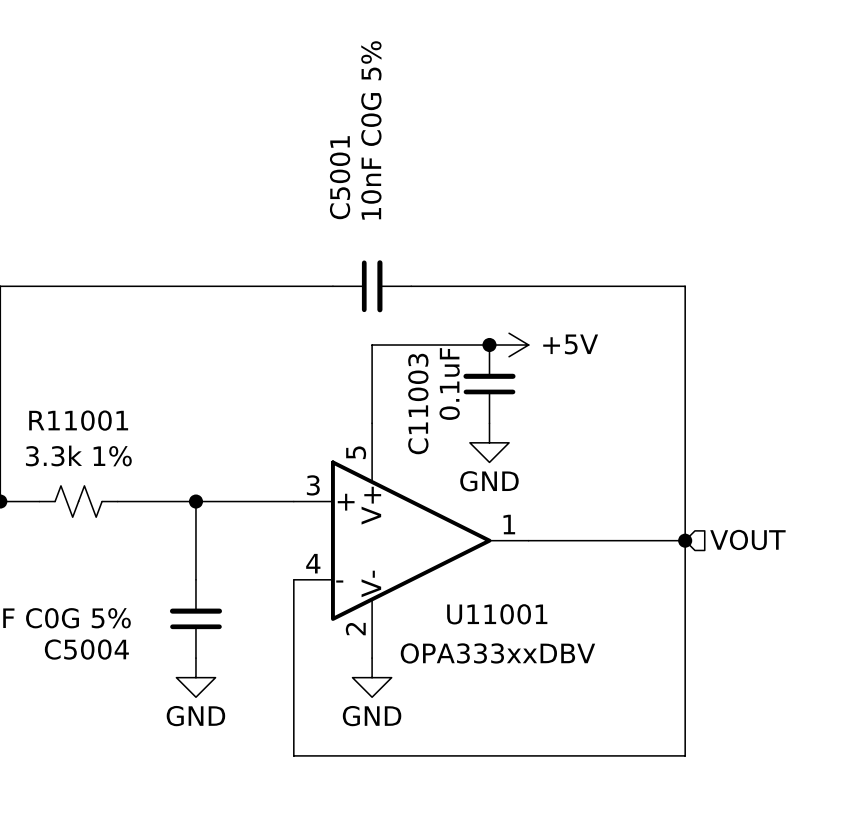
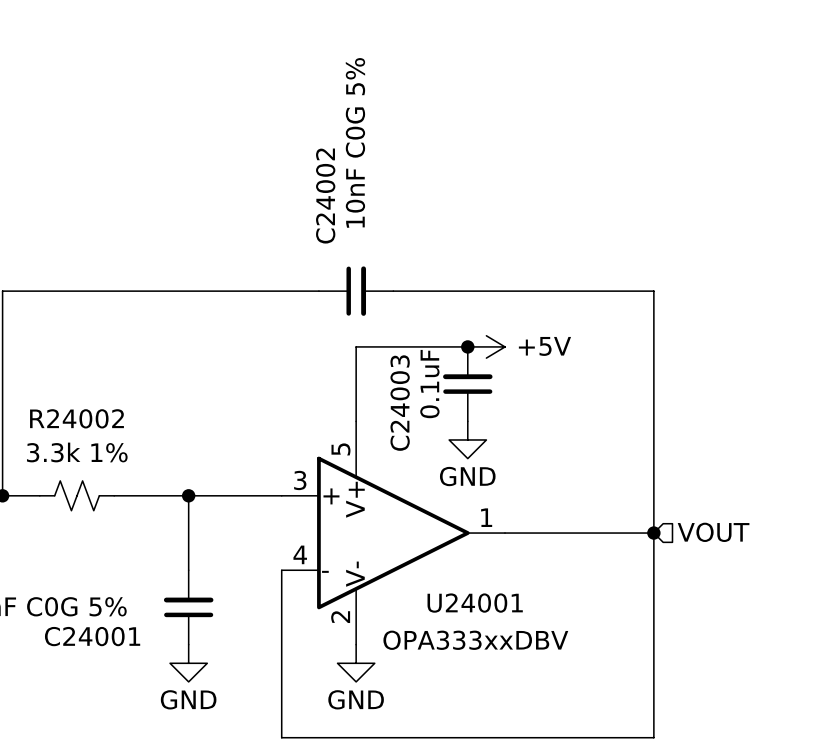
C5001 name: C5001 (340, 177) -> C24002 (325, 196)
C11003 name: C11003 (418, 404) -> C24003 (400, 403)
R11001 name: R11001 (78, 420) -> R24002 (76, 418)
U11001 name: U11001 (497, 614) -> U24001 (475, 603)
C5004 name: C5004 (86, 649) -> C24001 (92, 636)

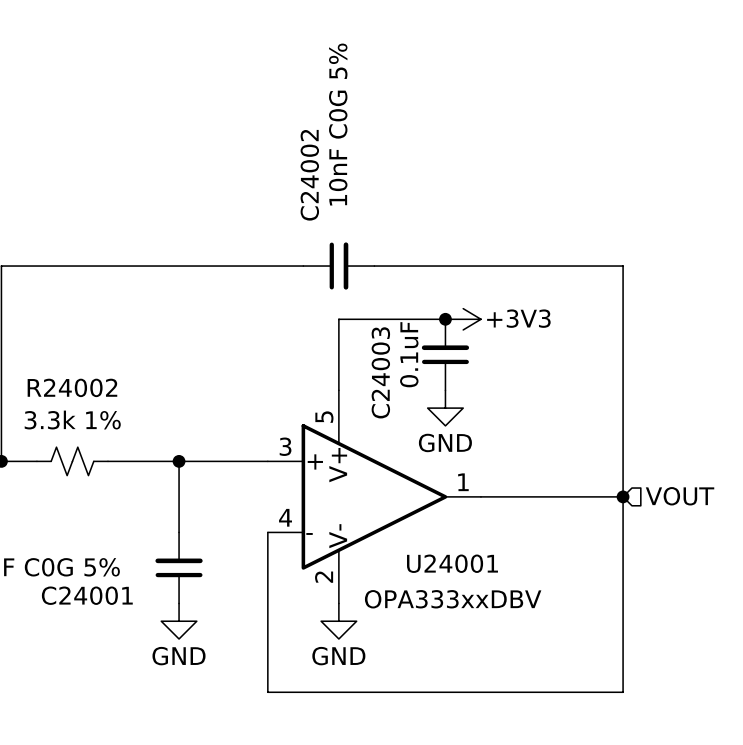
power symbol: +5V (486, 346) -> +3V3 (463, 319)

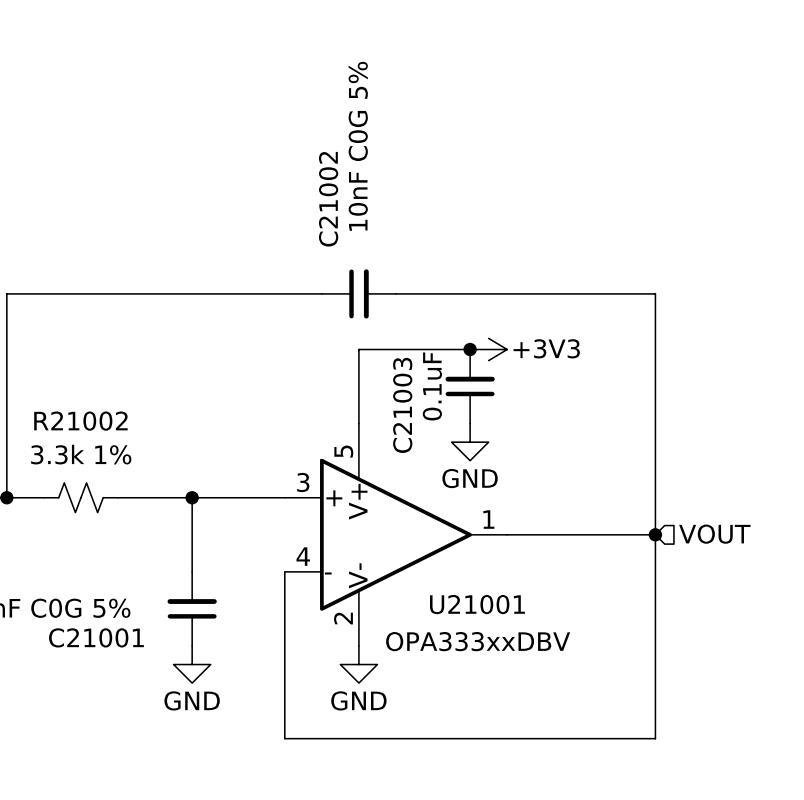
C24002 name: C24002 (309, 175) -> C21002 (328, 199)
C24003 name: C24003 (380, 372) -> C21003 (402, 405)
R24002 name: R24002 (72, 387) -> R21002 (80, 421)
U24001 name: U24001 (452, 563) -> U21001 (477, 604)
C24001 name: C24001 (87, 595) -> C21001 (96, 637)

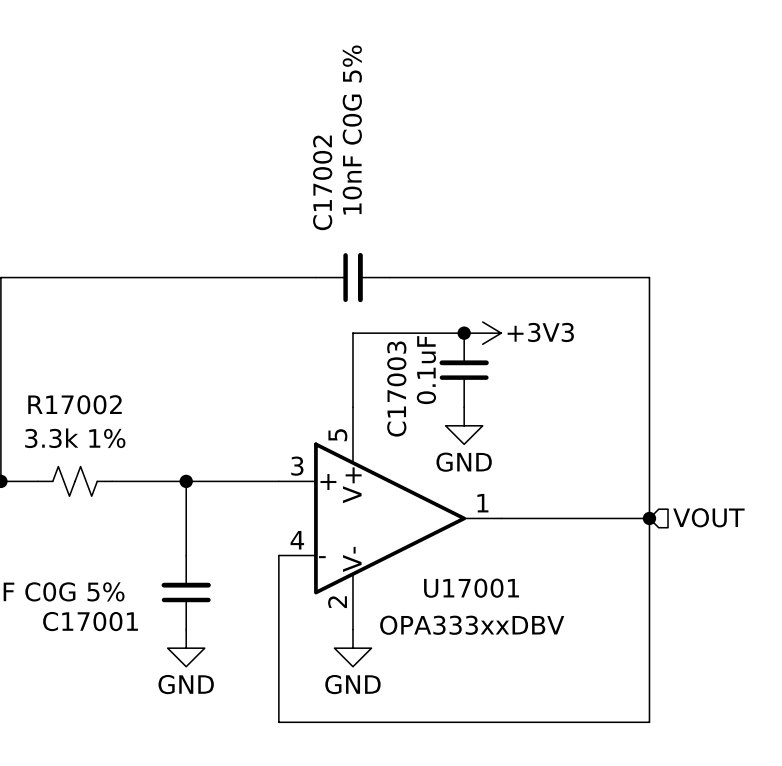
C21002 name: C21002 (328, 199) -> C17002 (322, 182)
C21003 name: C21003 (402, 405) -> C17003 (396, 389)
R21002 name: R21002 (80, 421) -> R17002 (75, 404)
U21001 name: U21001 (477, 604) -> U17001 (471, 588)
C21001 name: C21001 (96, 637) -> C17001 (90, 621)

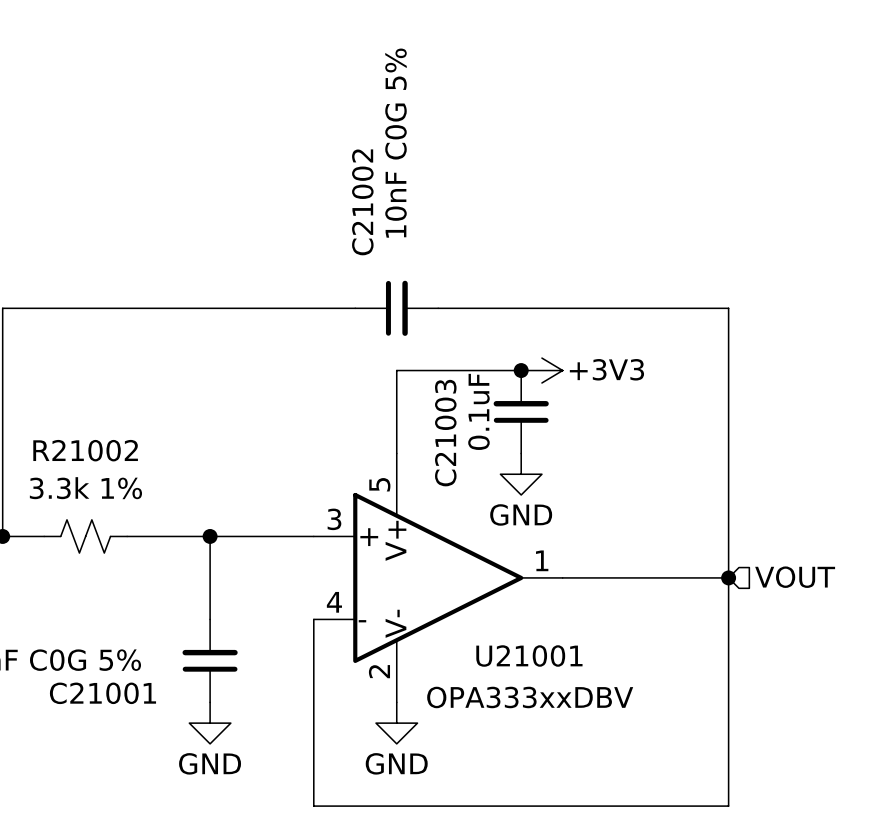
C17002 name: C17002 (322, 182) -> C21002 (362, 202)
C17003 name: C17003 (396, 389) -> C21003 (445, 433)
R17002 name: R17002 (75, 404) -> R21002 (85, 450)
U17001 name: U17001 (471, 588) -> U21001 (529, 656)
C17001 name: C17001 (90, 621) -> C21001 (102, 693)

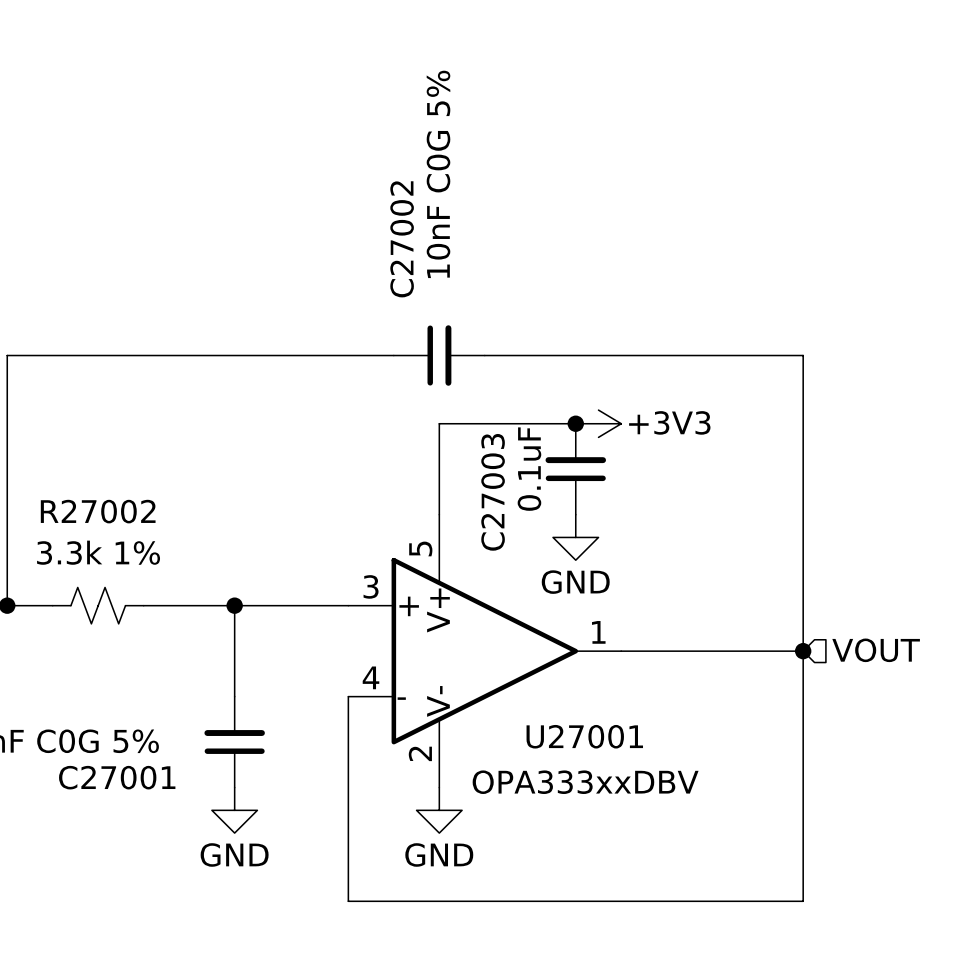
C21002 name: C21002 (362, 202) -> C27002 (402, 239)
C21003 name: C21003 (445, 433) -> C27003 (493, 492)
R21002 name: R21002 (85, 450) -> R27002 (98, 511)
U21001 name: U21001 (529, 656) -> U27001 (584, 736)
C21001 name: C21001 (102, 693) -> C27001 (117, 777)

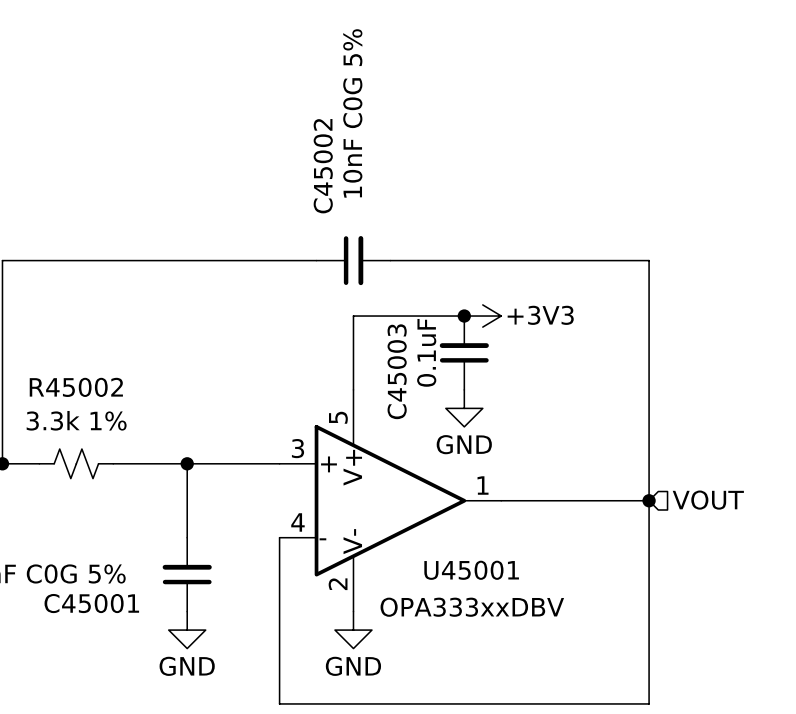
C27002 name: C27002 (402, 239) -> C45002 (323, 166)
C27003 name: C27003 (493, 492) -> C45003 (397, 371)
R27002 name: R27002 (98, 511) -> R45002 (76, 387)
U27001 name: U27001 (584, 736) -> U45001 (471, 570)
C27001 name: C27001 (117, 777) -> C45001 (91, 603)

